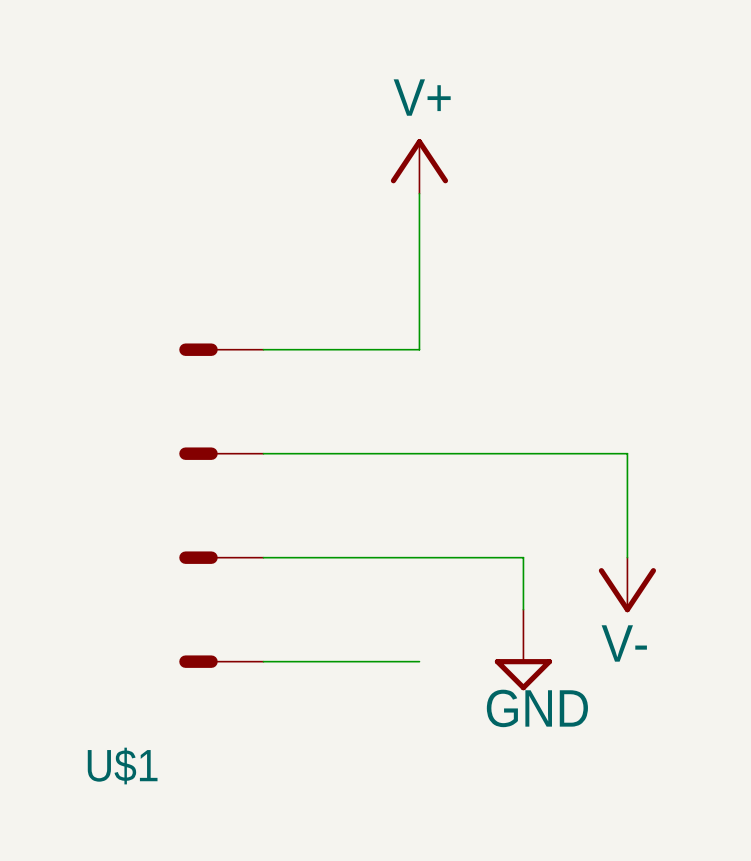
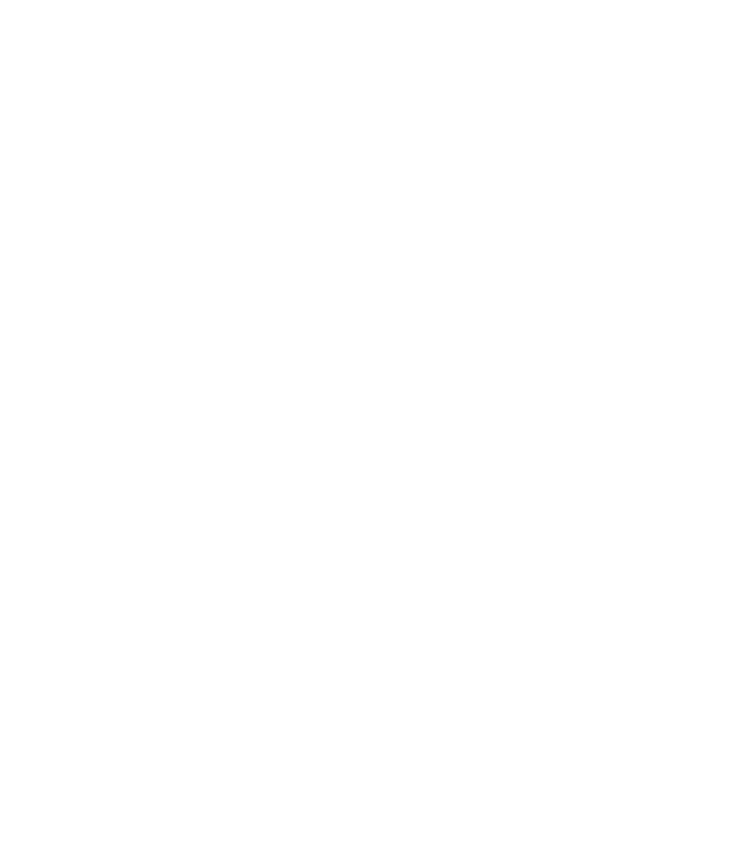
power symbol: V+ (419, 166) -> none
wire: (419, 193) (419, 349) (263, 349) -> none
wire: (263, 453) (627, 453) (627, 557) -> none
U$1: (221, 505) -> none
wire: (263, 557) (523, 557) (523, 609) -> none
power symbol: V- (627, 584) -> none
power symbol: GND (523, 649) -> none
wire: (263, 661) (419, 661) -> none

